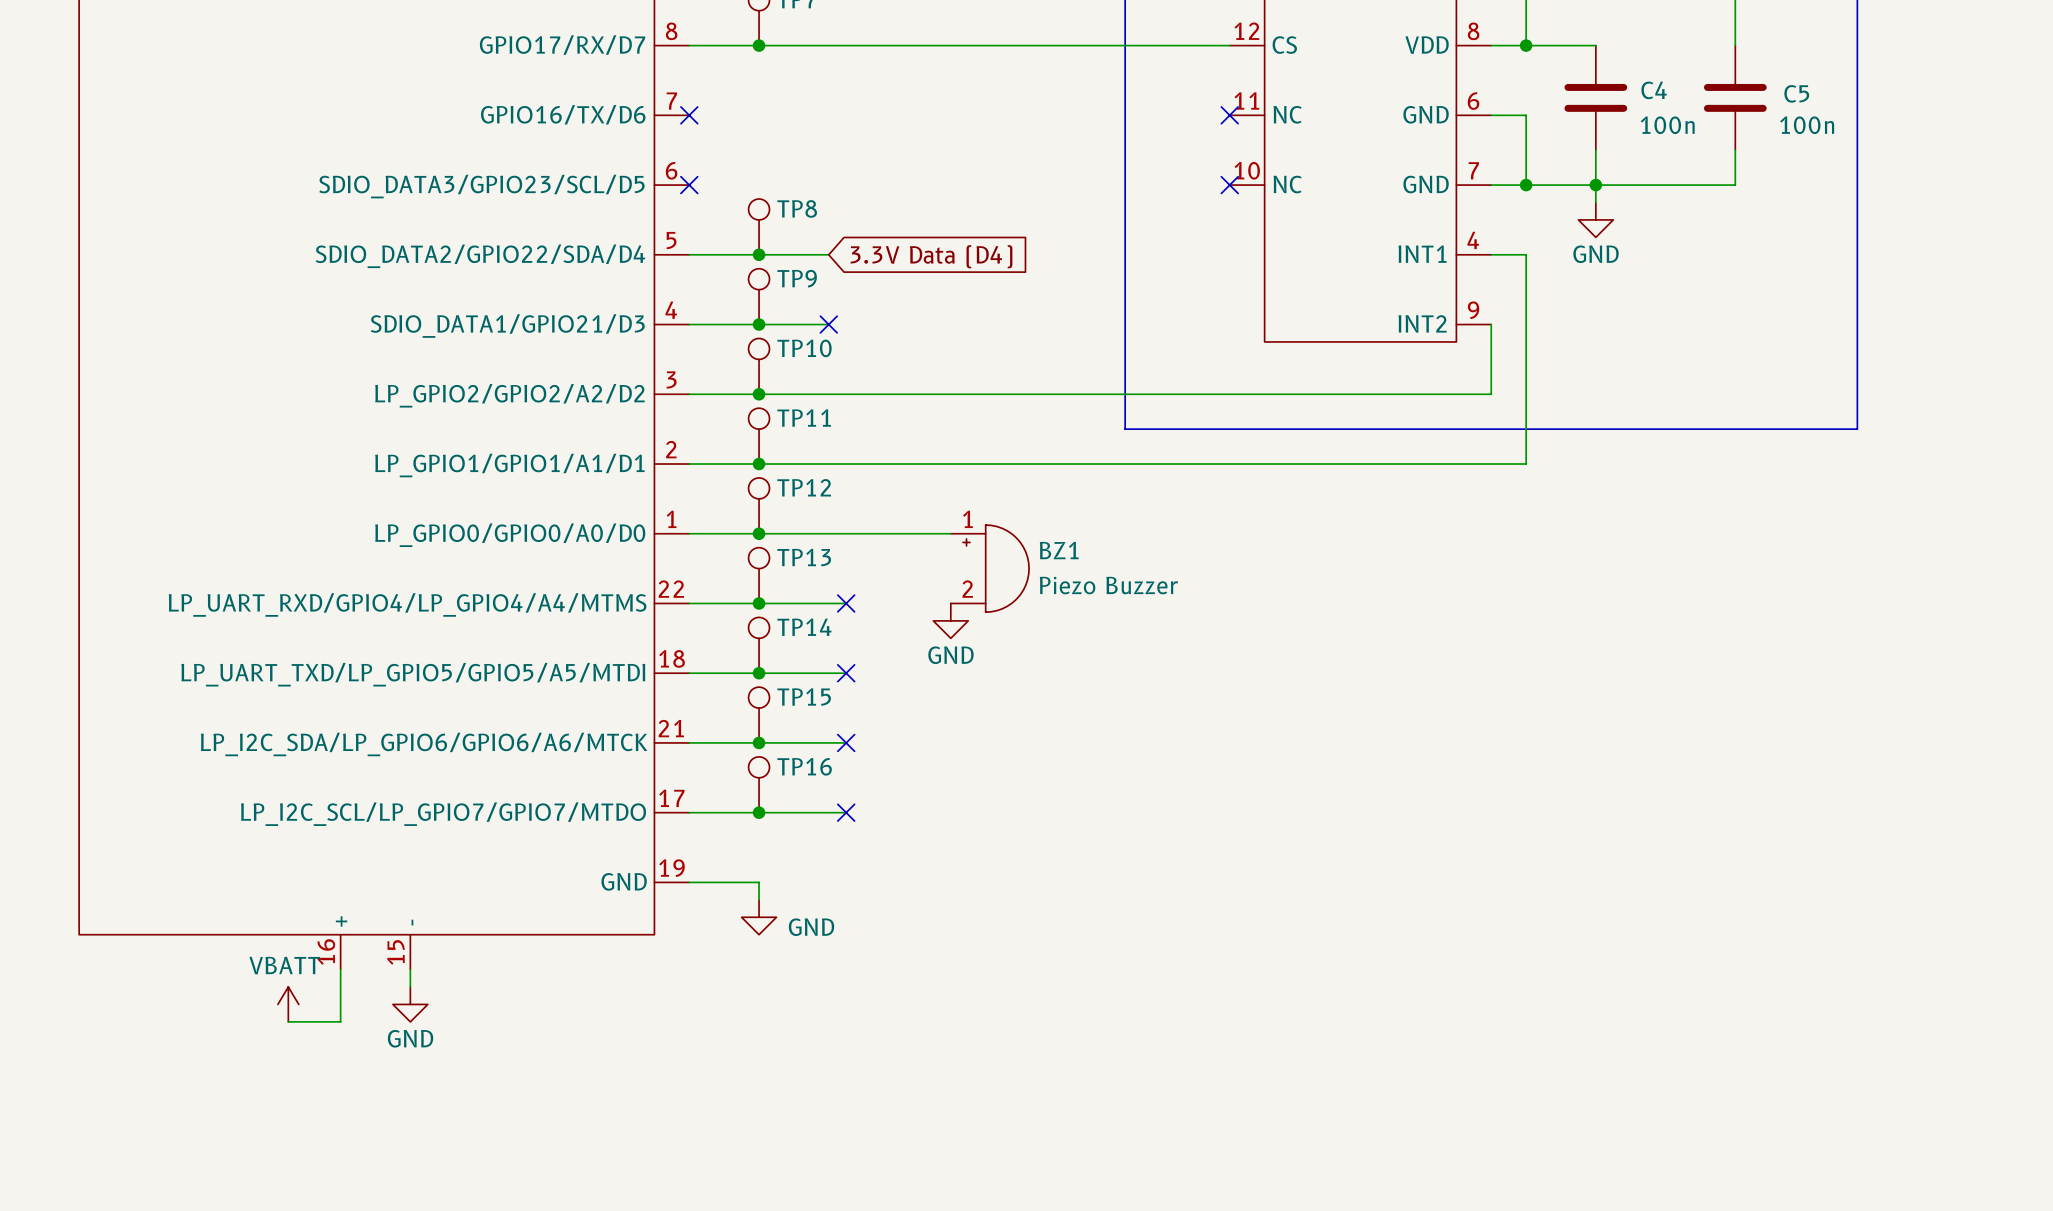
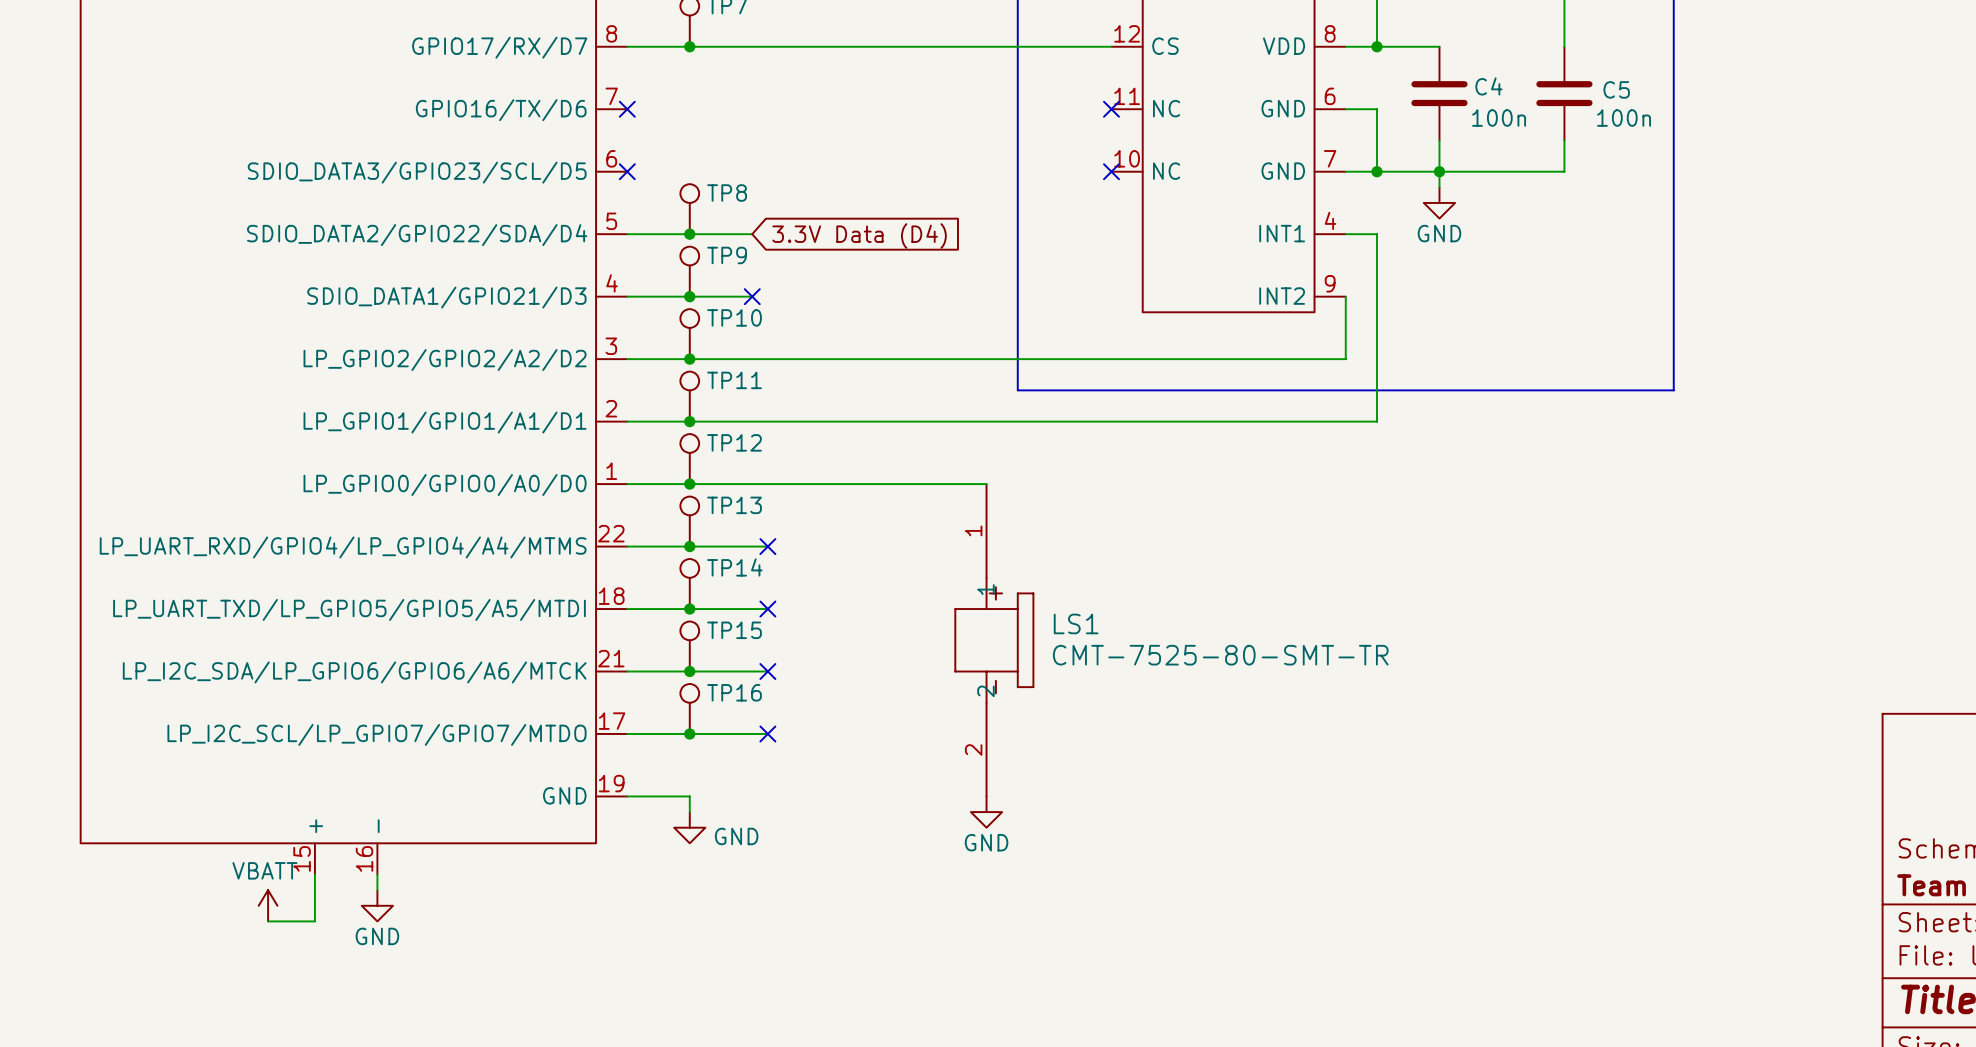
wire: none -> (861, 484) (986, 484)
BZ1: Piezo Buzzer (989, 568) -> none
power symbol position: GND (950, 620) -> GND (986, 812)
LS1: none -> CMT-7525-80-SMT-TR (994, 640)
part pin number: 16 (326, 952) -> 15 (302, 858)
part pin number: 15 (395, 952) -> 16 (364, 858)

